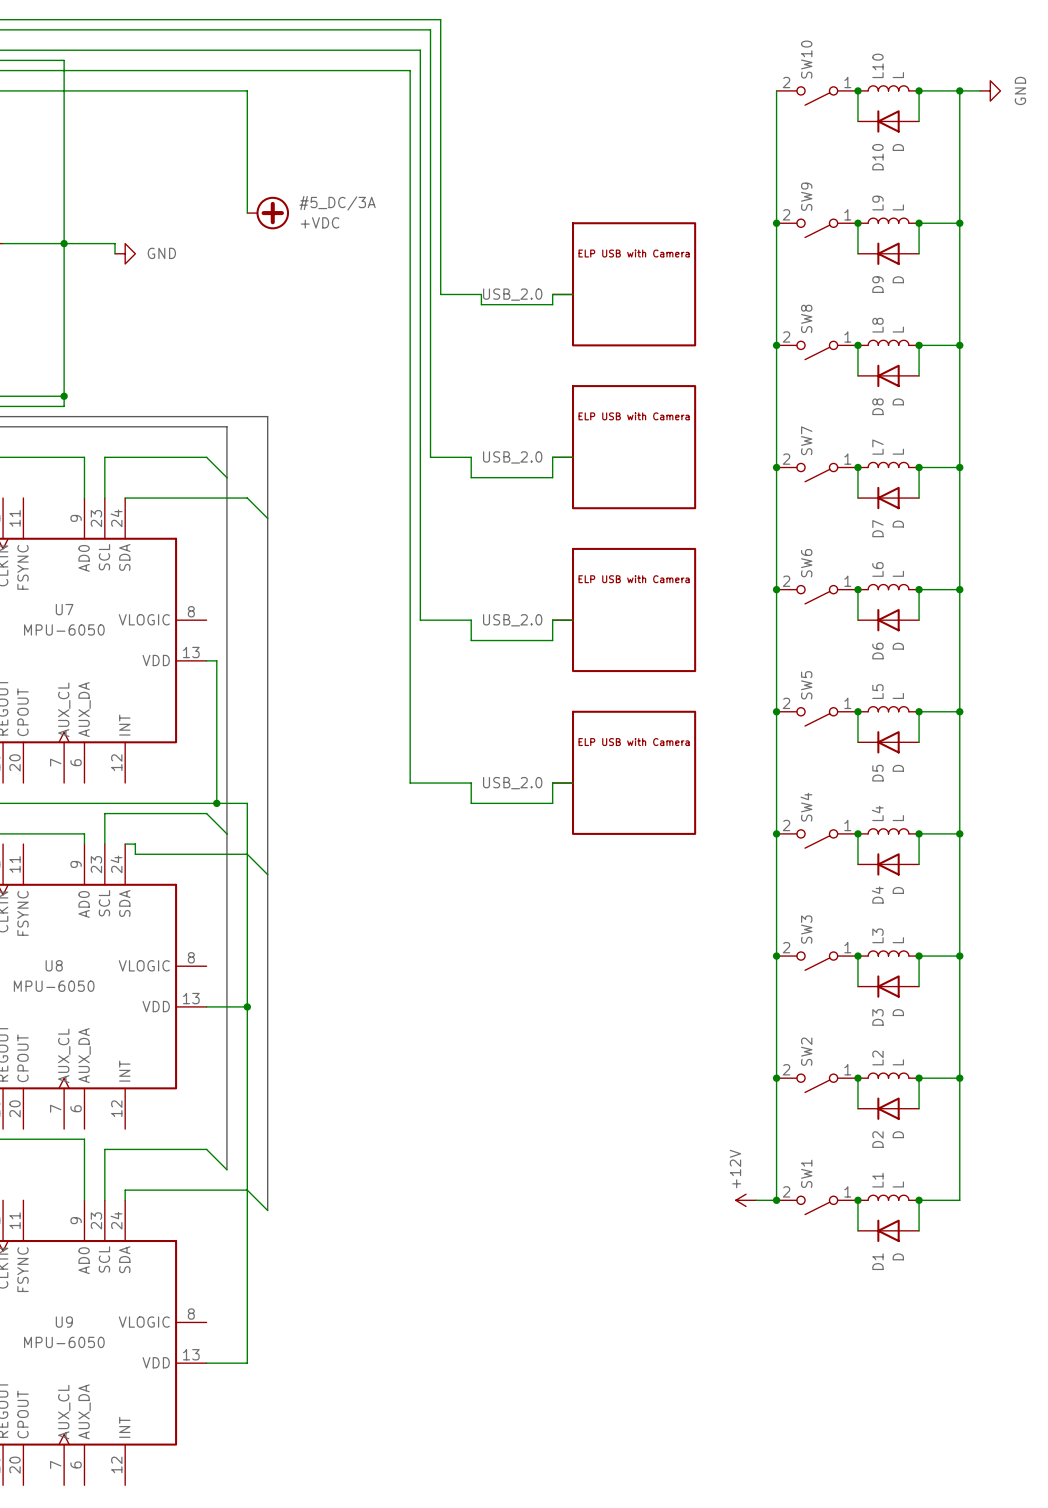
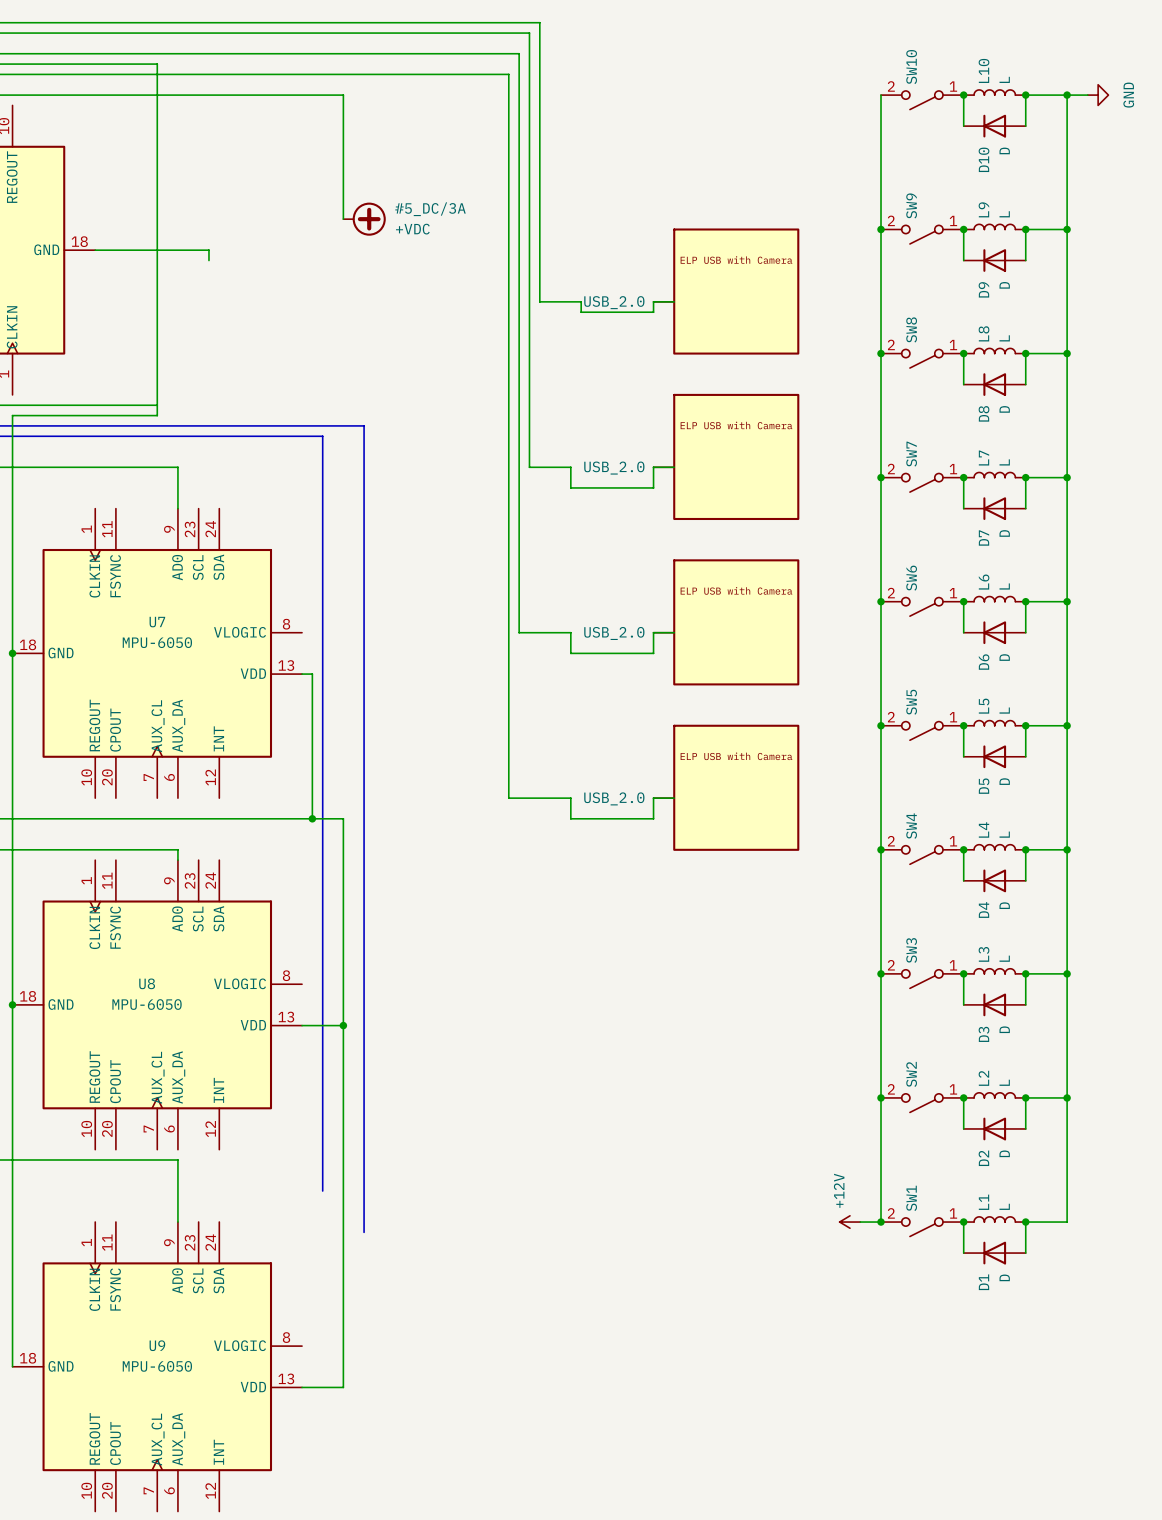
junction: (64, 243) -> none
power symbol: GND (125, 253) -> none
junction: (64, 396) -> none
wire: (226, 477) (206, 457) (104, 457) (104, 498) -> none
wire: (125, 498) (247, 498) (267, 518) -> none
wire: (226, 833) (206, 813) (104, 813) (104, 844) -> none
wire: (125, 844) (135, 844) (135, 854) (247, 854) (267, 874) -> none
wire: (226, 1169) (206, 1149) (104, 1149) (104, 1200) -> none
wire: (125, 1200) (125, 1190) (247, 1190) (267, 1210) -> none

